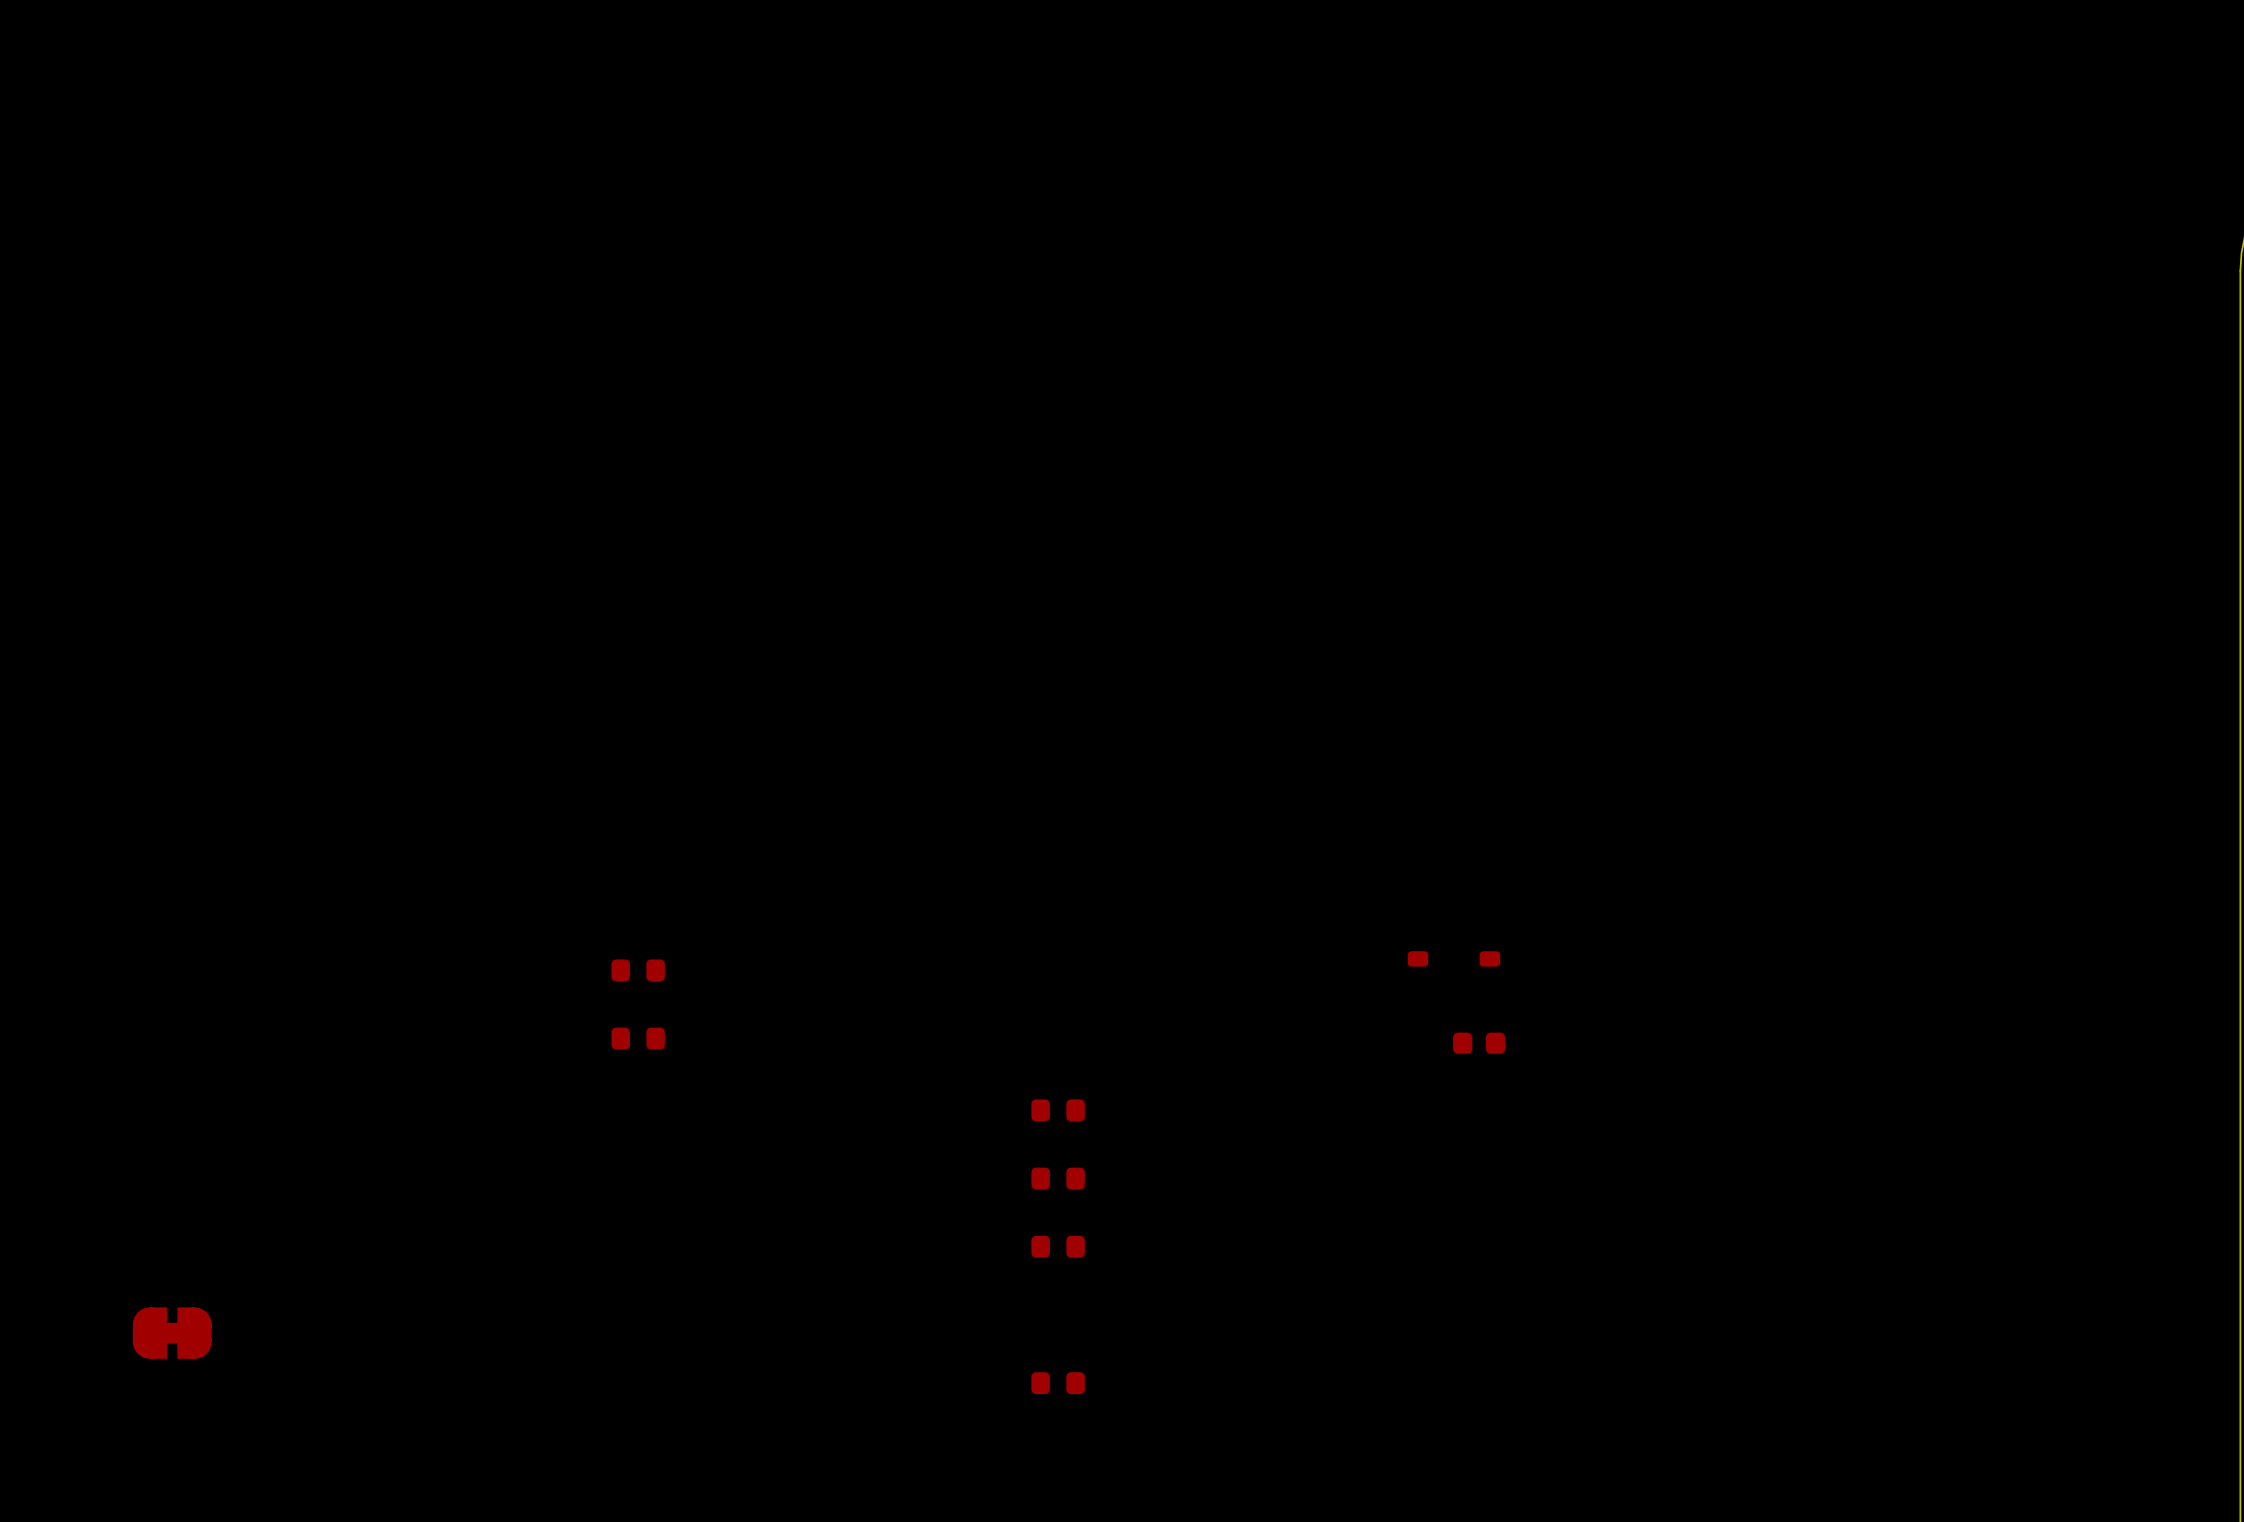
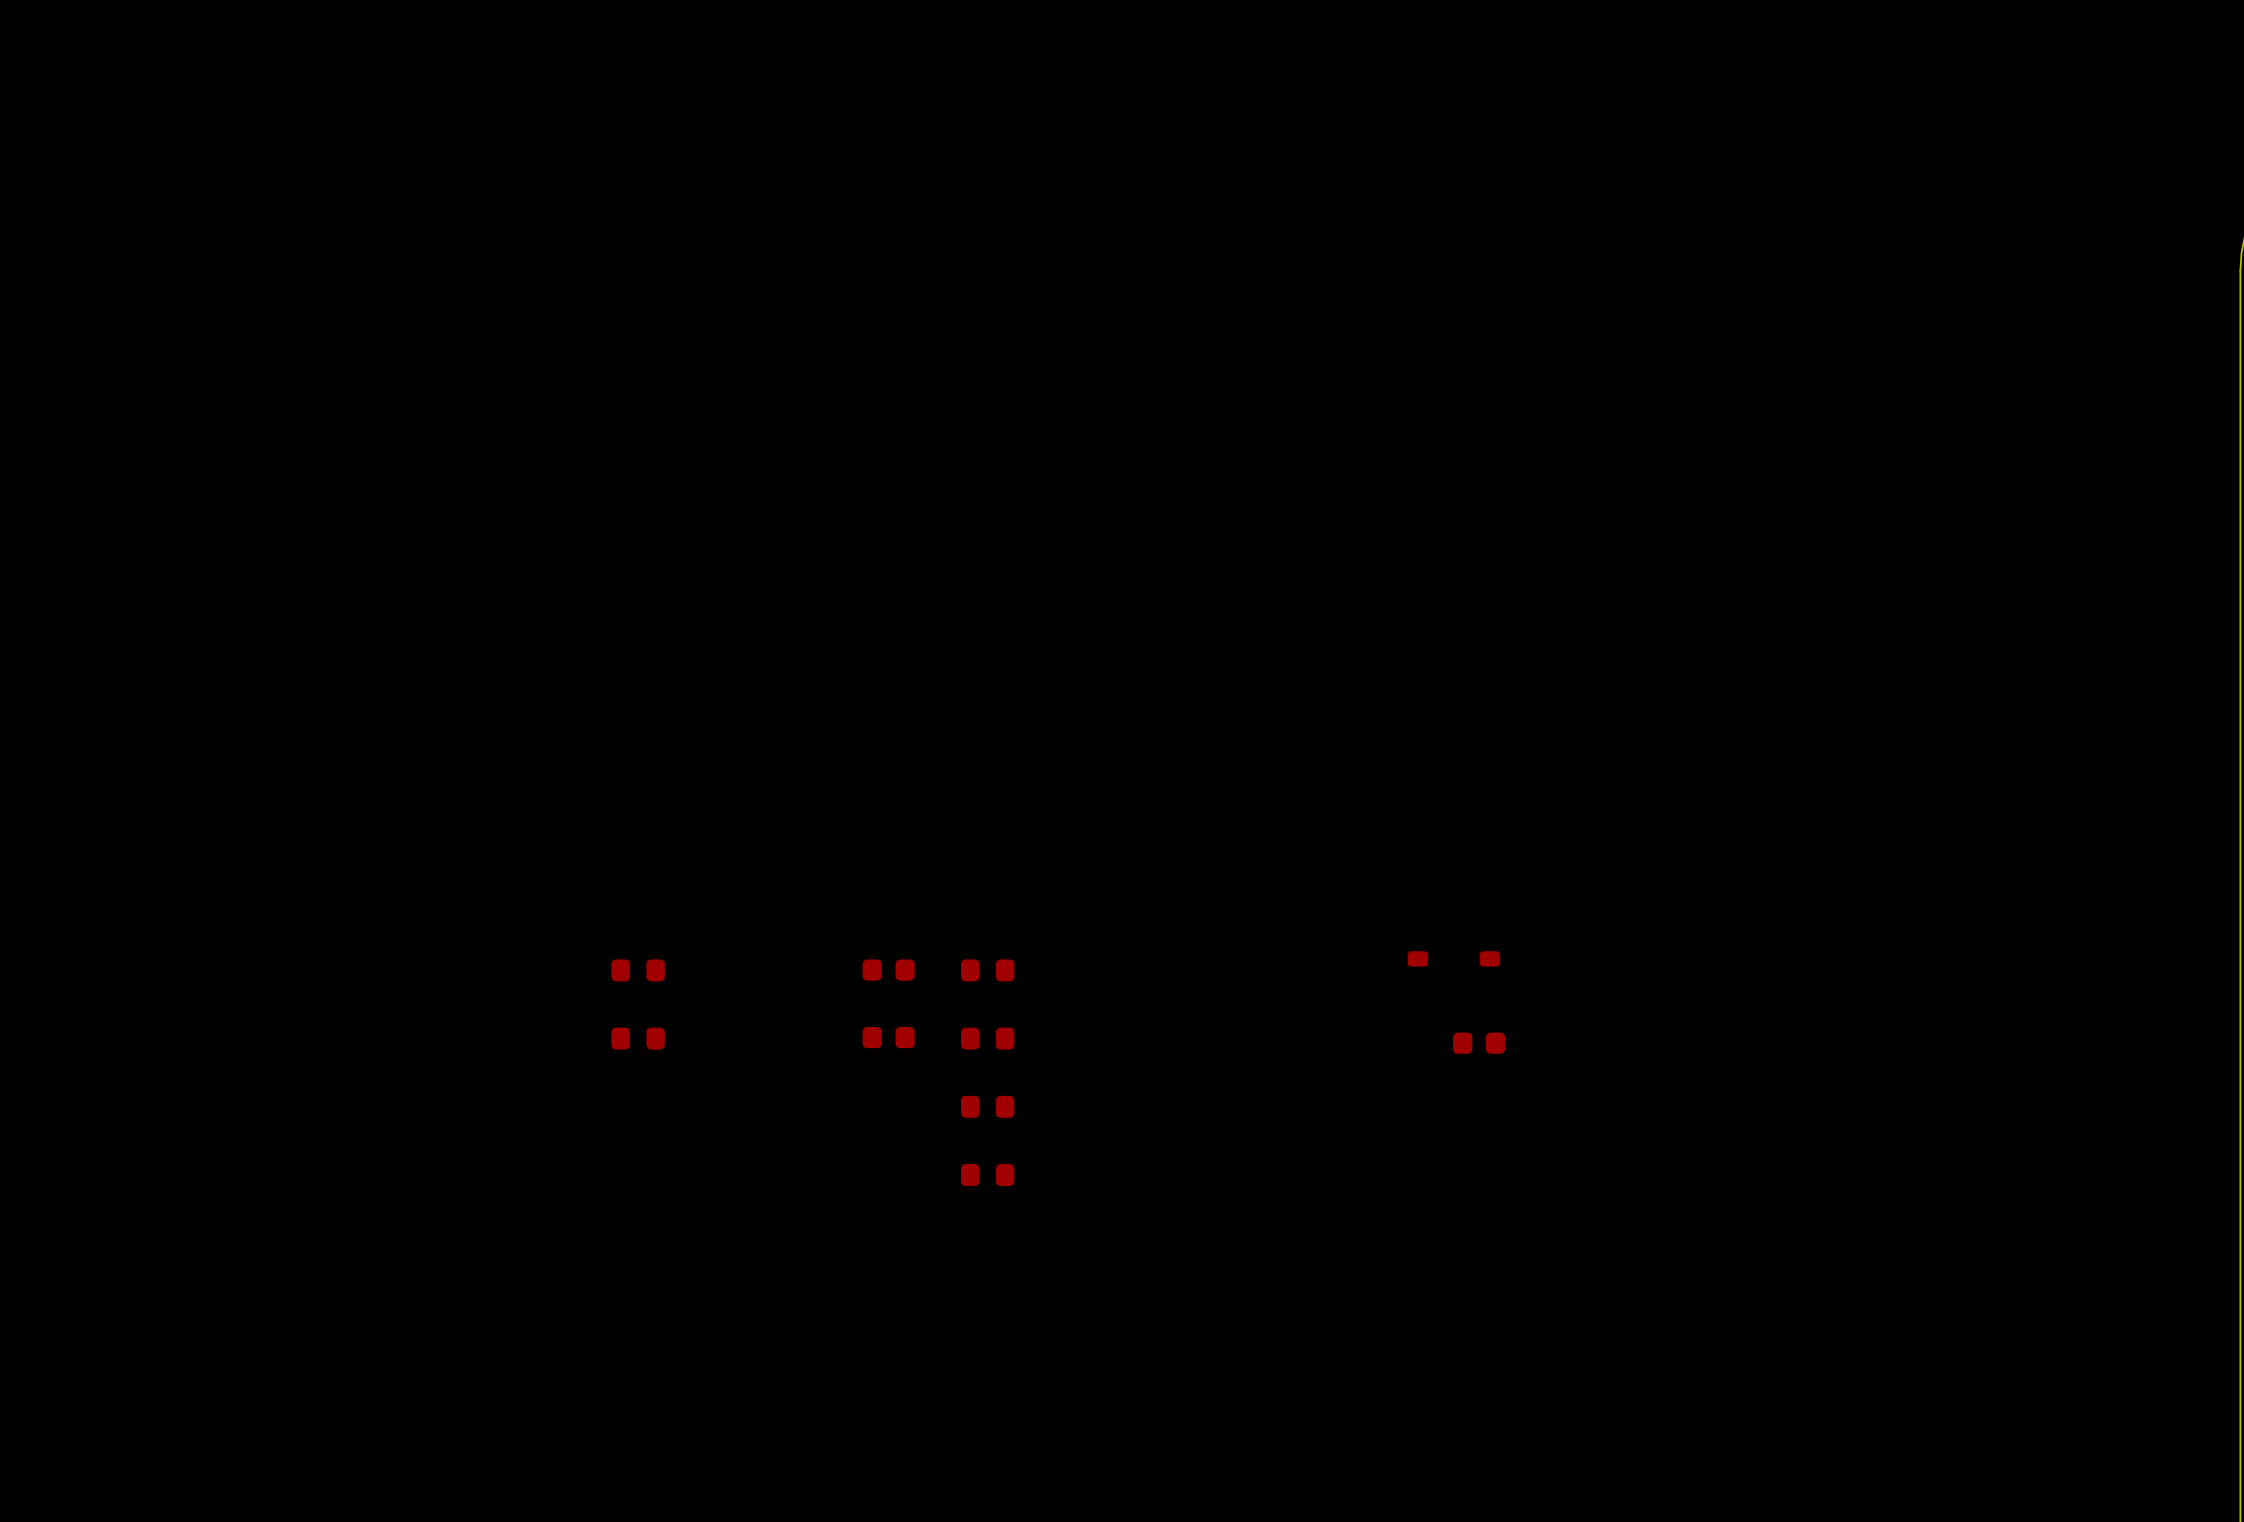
part: none -> (888, 970)
part: none -> (987, 970)
part: none -> (888, 1037)
part: none -> (987, 1038)
part: none -> (987, 1106)
part: (1058, 1110) -> none
part: none -> (987, 1174)
part: (1058, 1178) -> none
part: (1058, 1246) -> none
part: (172, 1333) -> none
part: (1058, 1383) -> none

